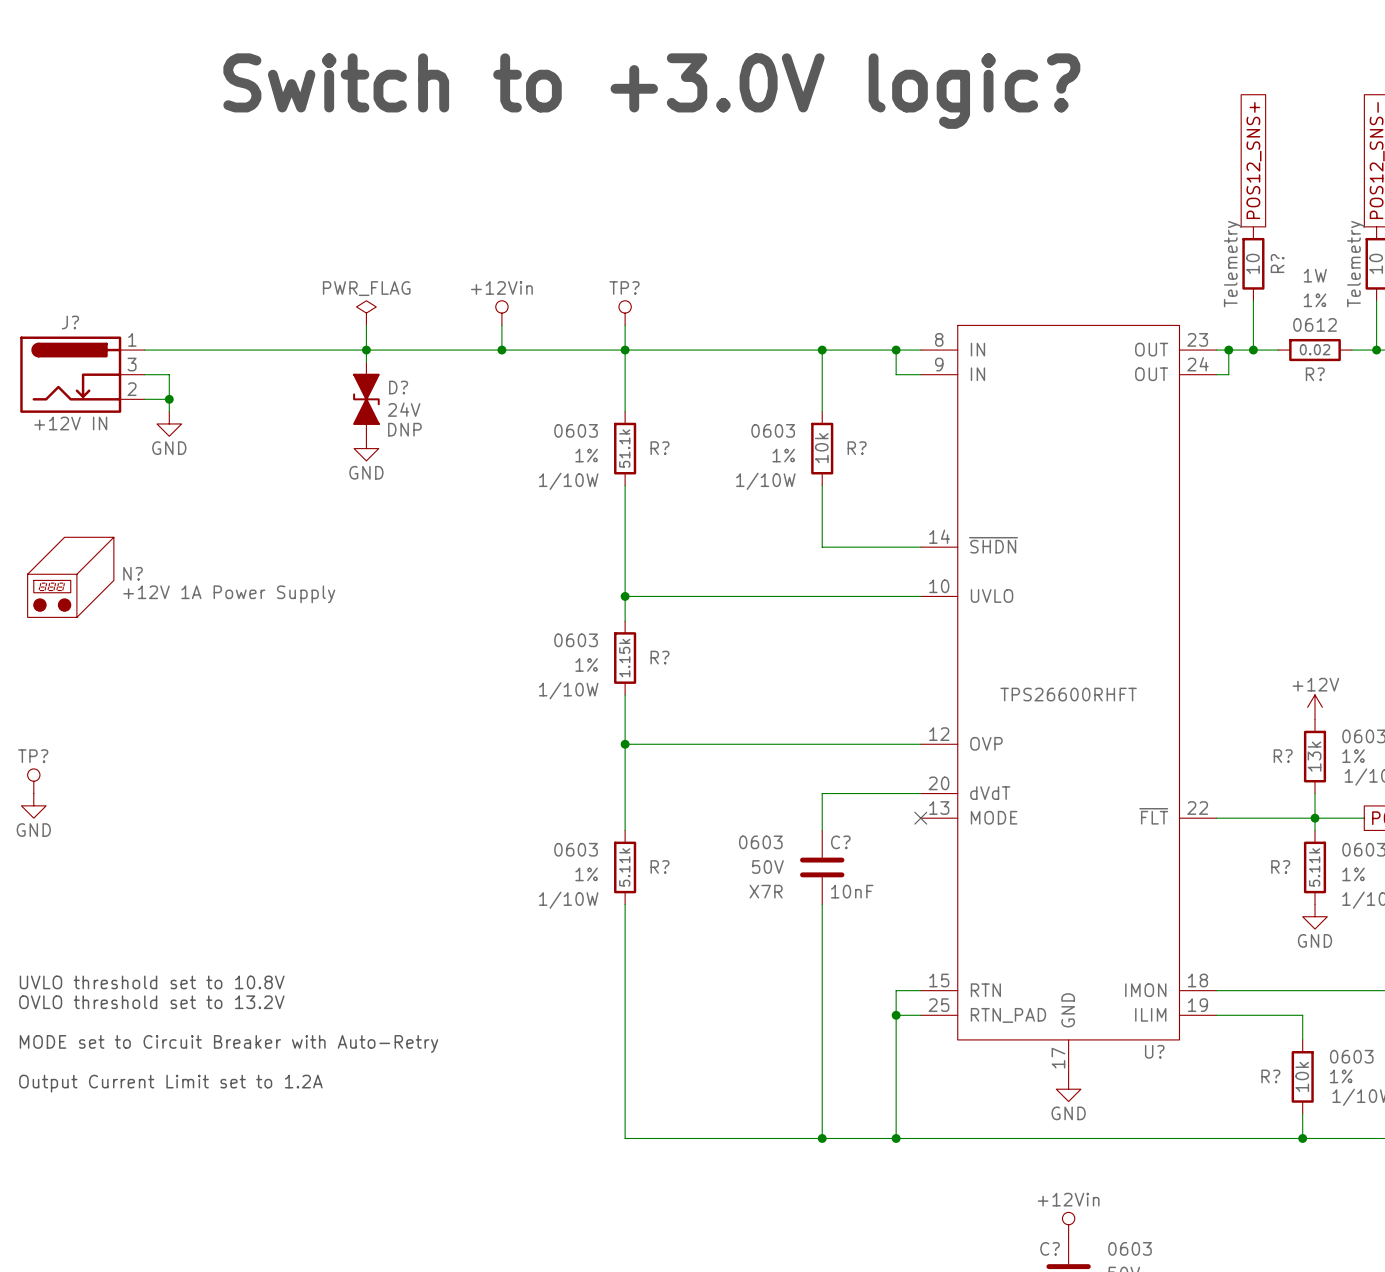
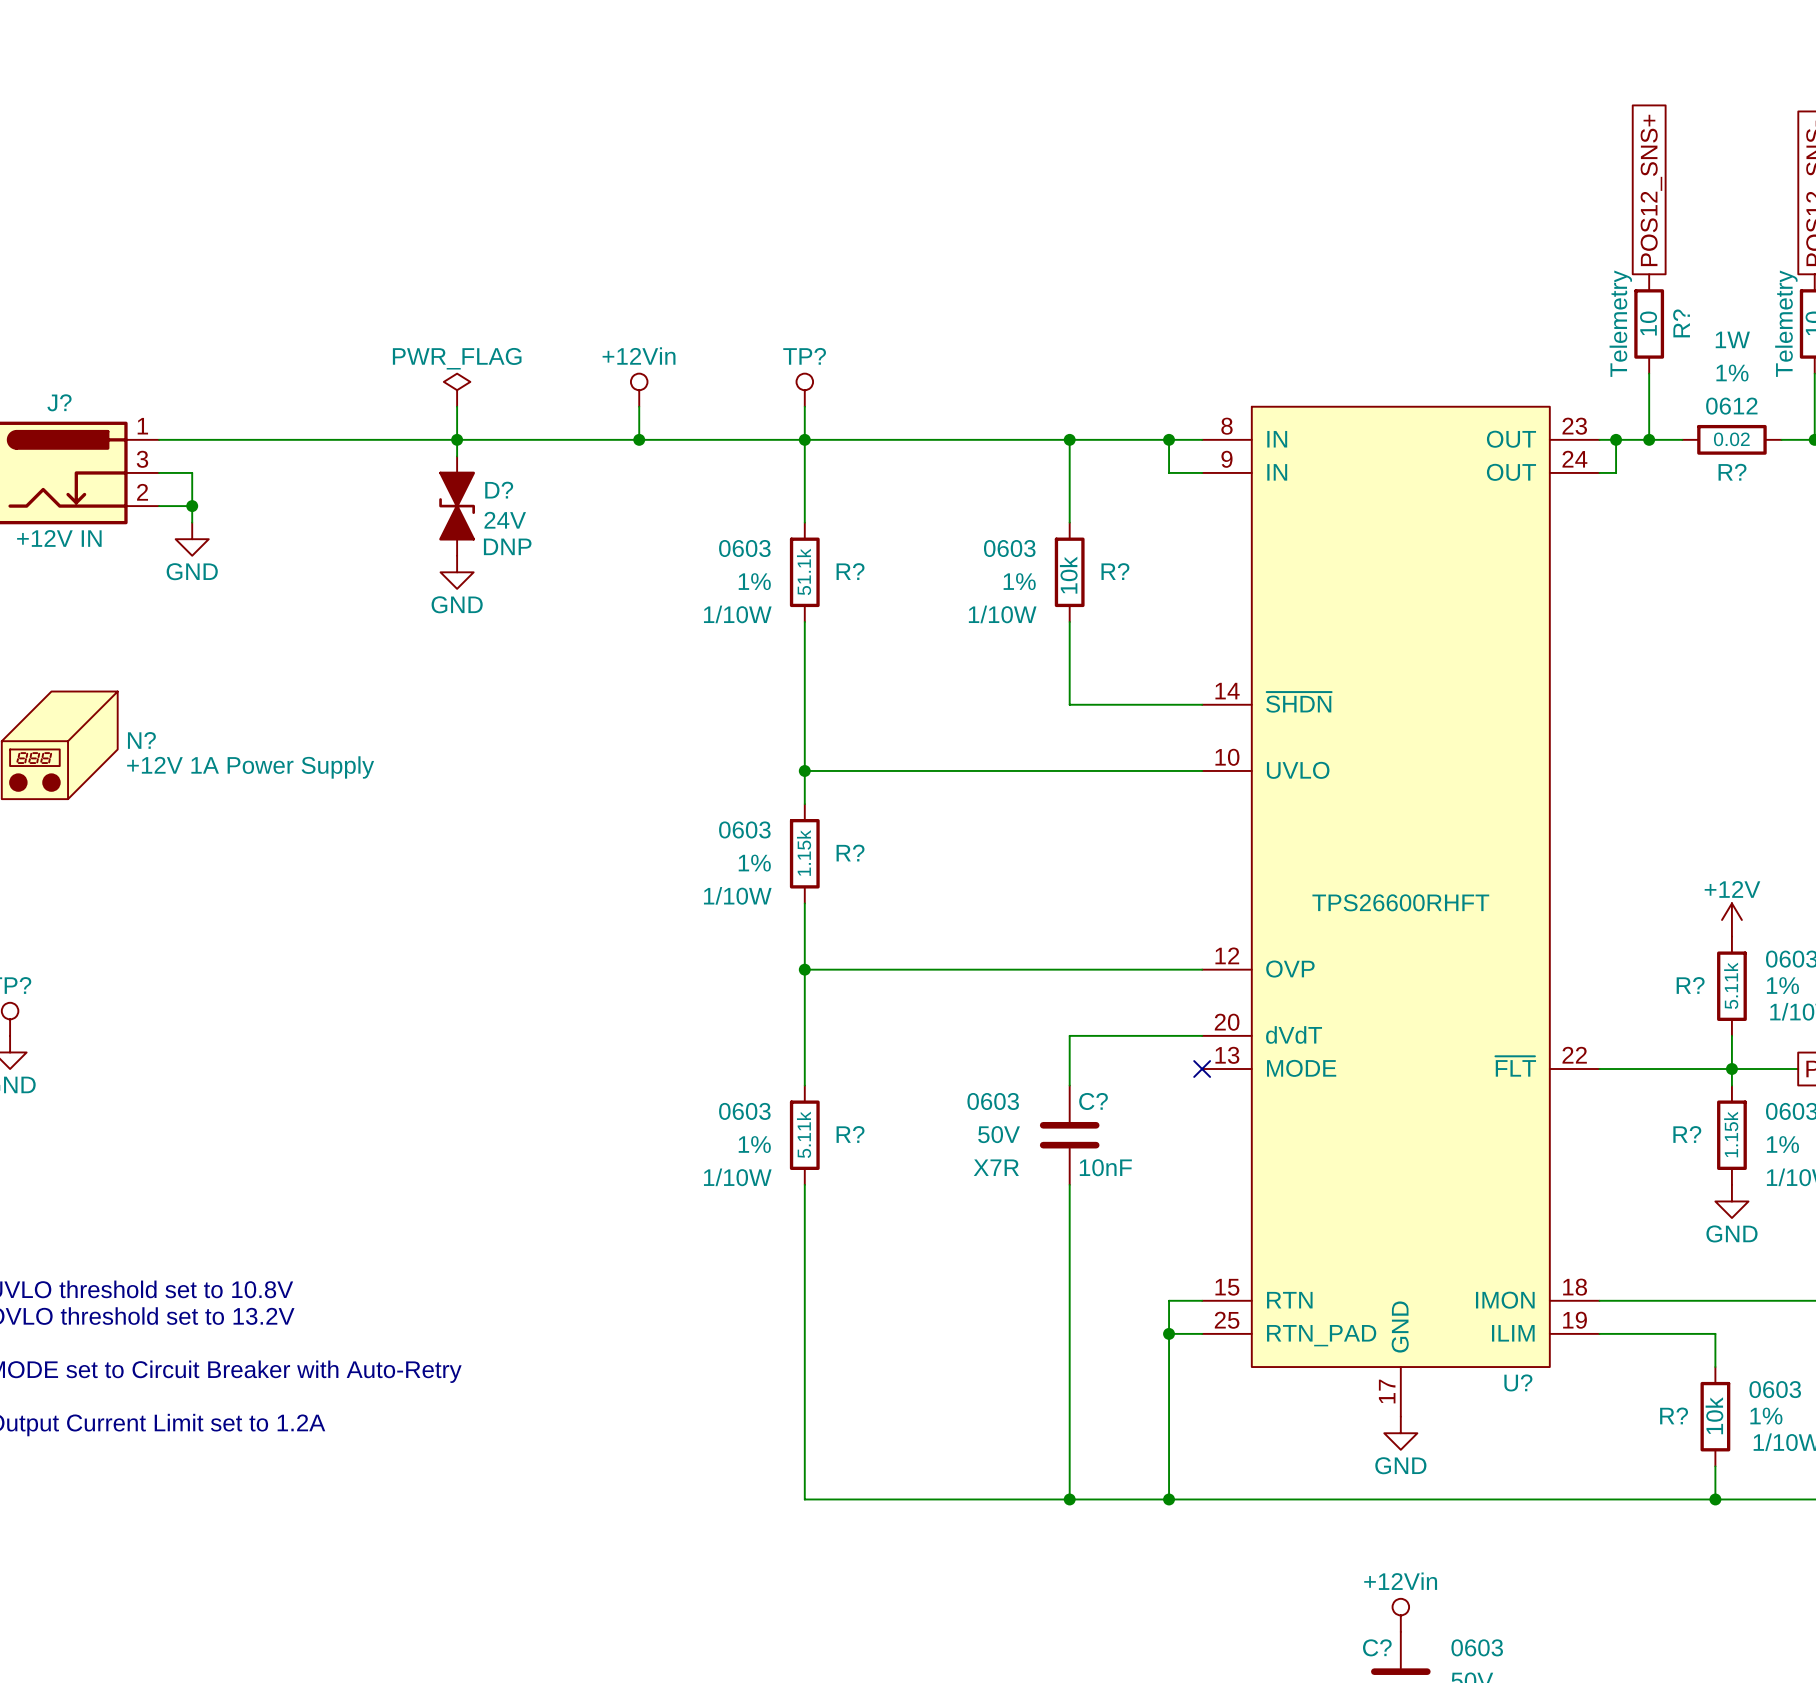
text: Switch to +3.0V logic? (651, 91) -> none
R? value: 13k (1314, 756) -> 5.11k (1731, 985)
R? value: 5.11k (1314, 867) -> 1.15k (1731, 1134)

